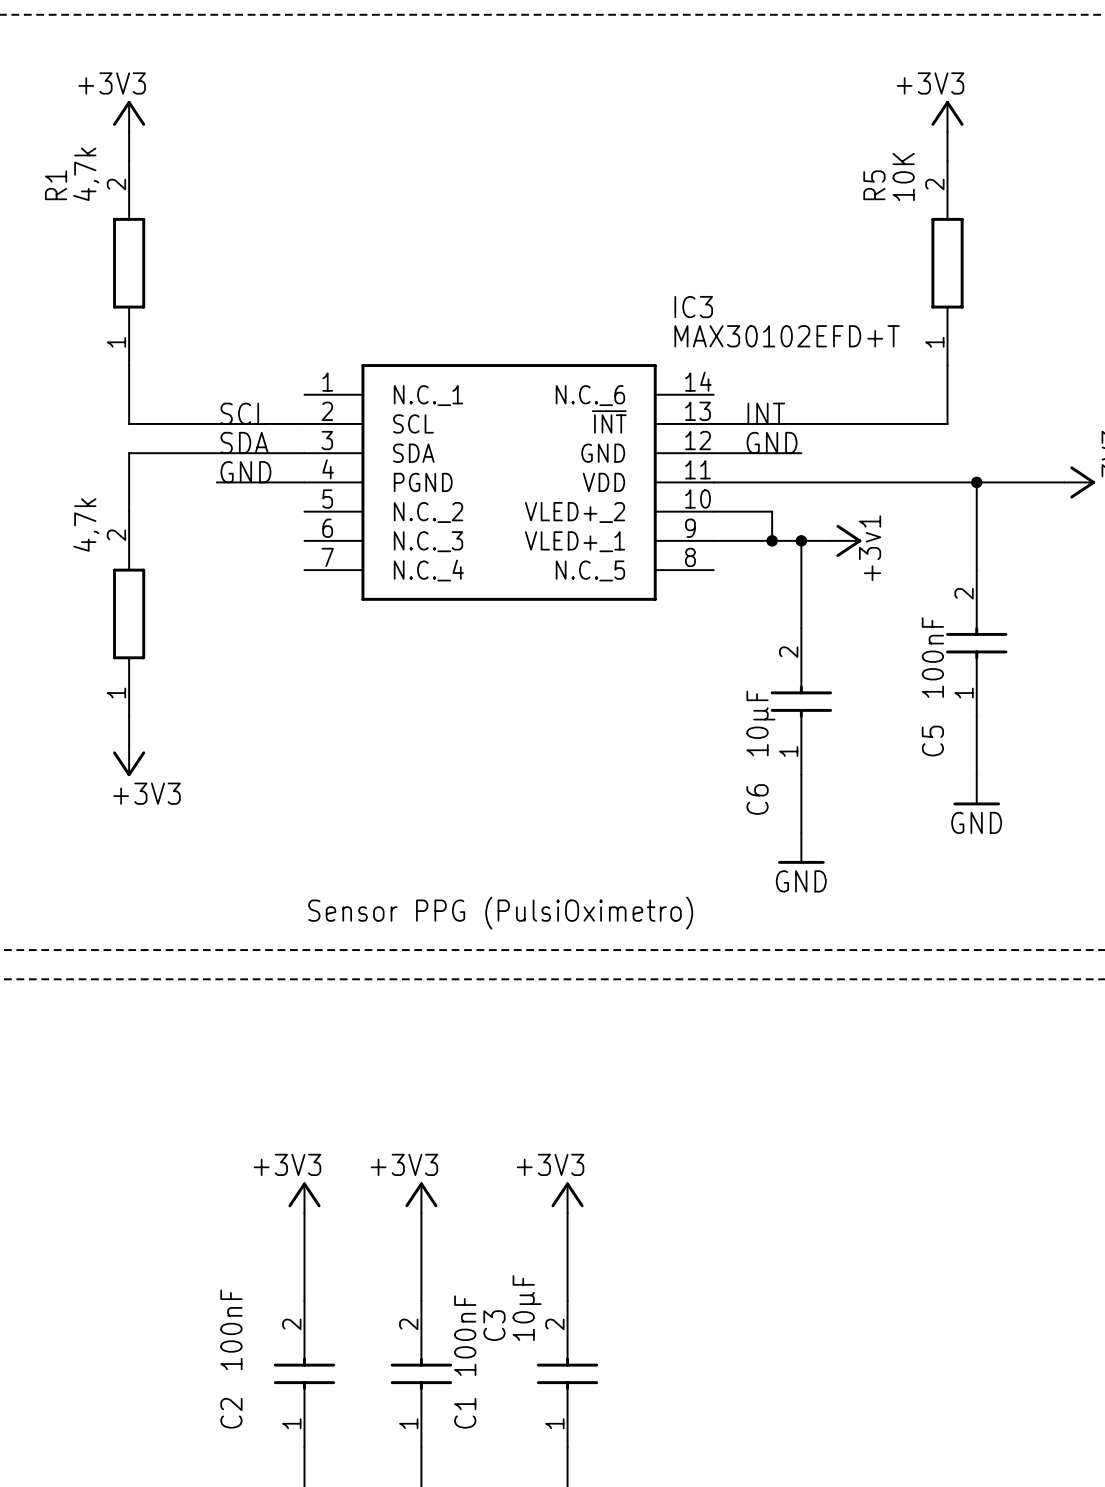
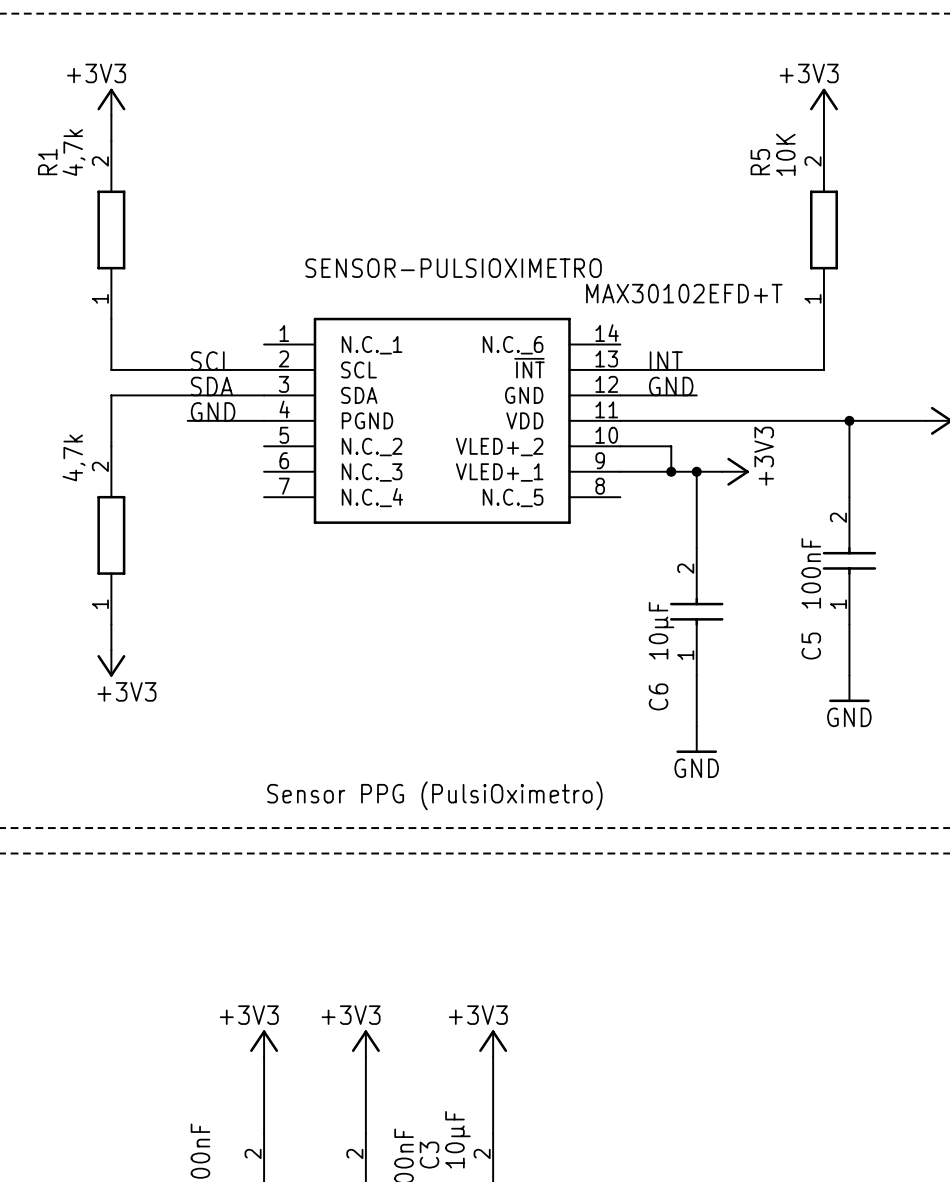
IC3 name: IC3 (693, 307) -> SENSOR-PULSIOXIMETRO (453, 268)
power symbol text: none -> +3V3 (764, 456)
power symbol text: +3v1 (870, 548) -> none

